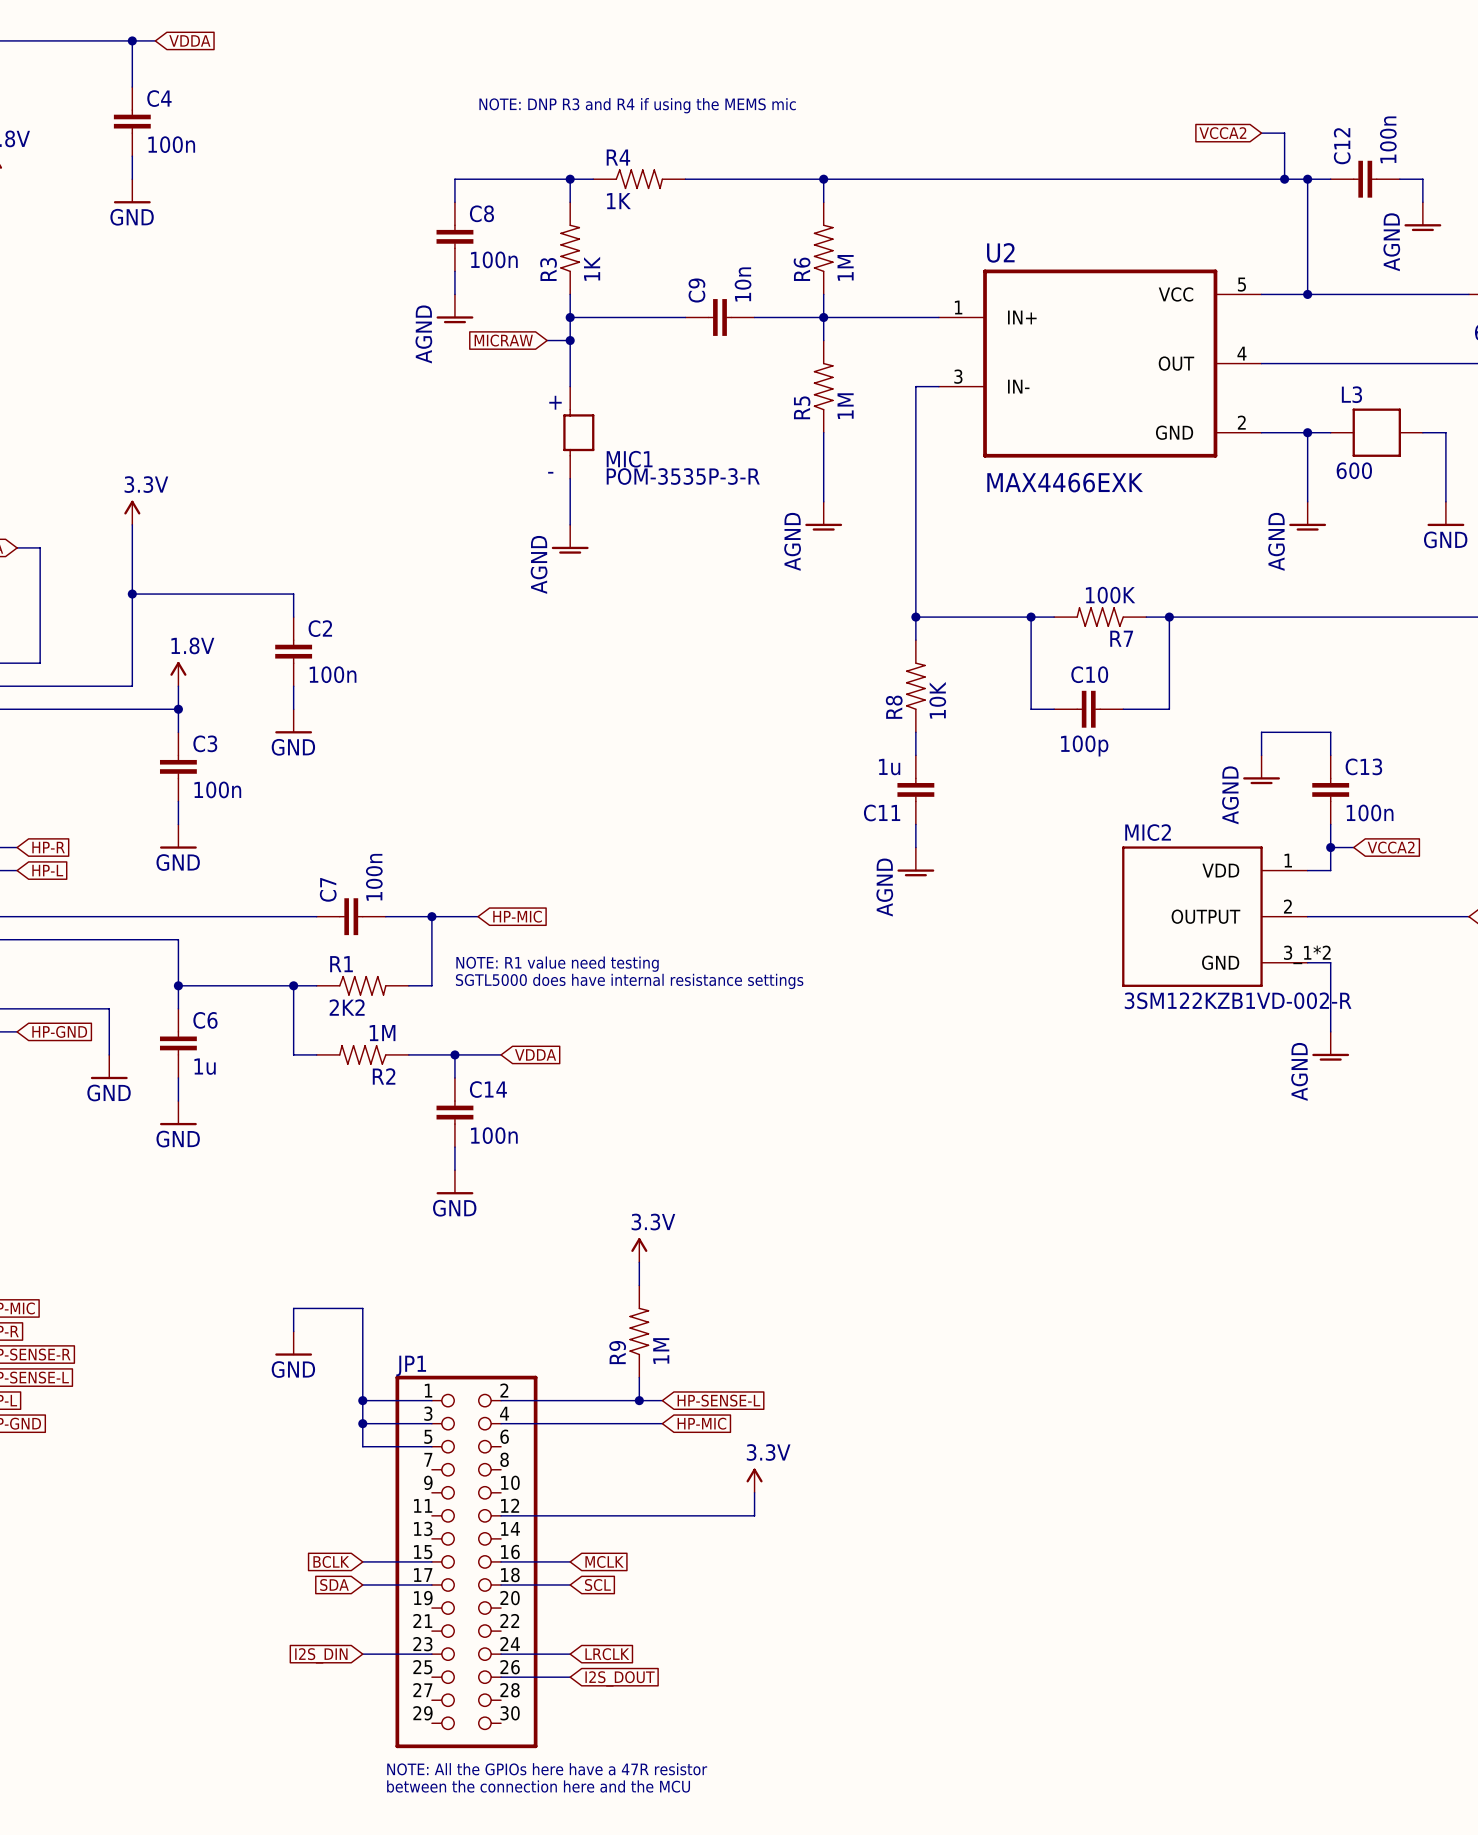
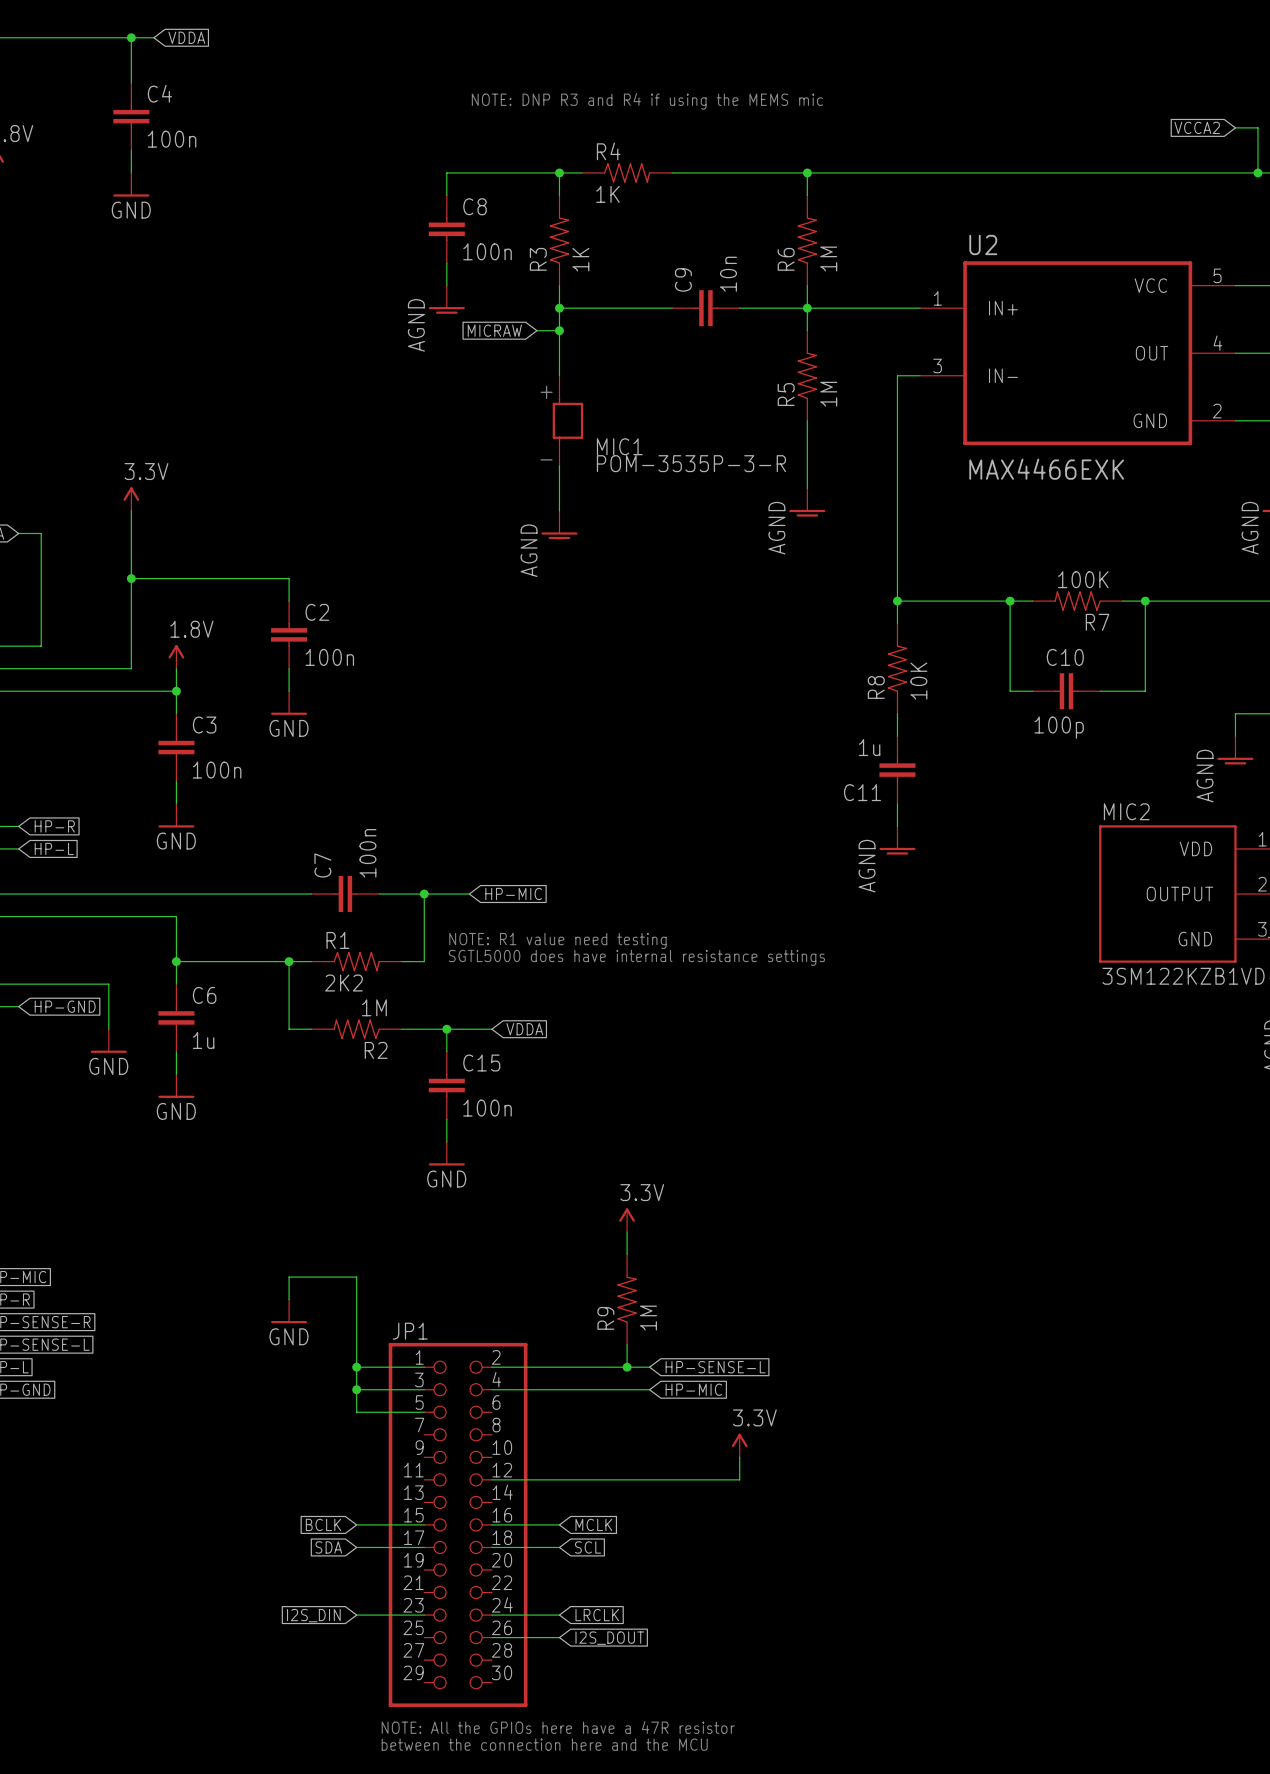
C14 name: C14 (488, 1089) -> C15 (481, 1063)

